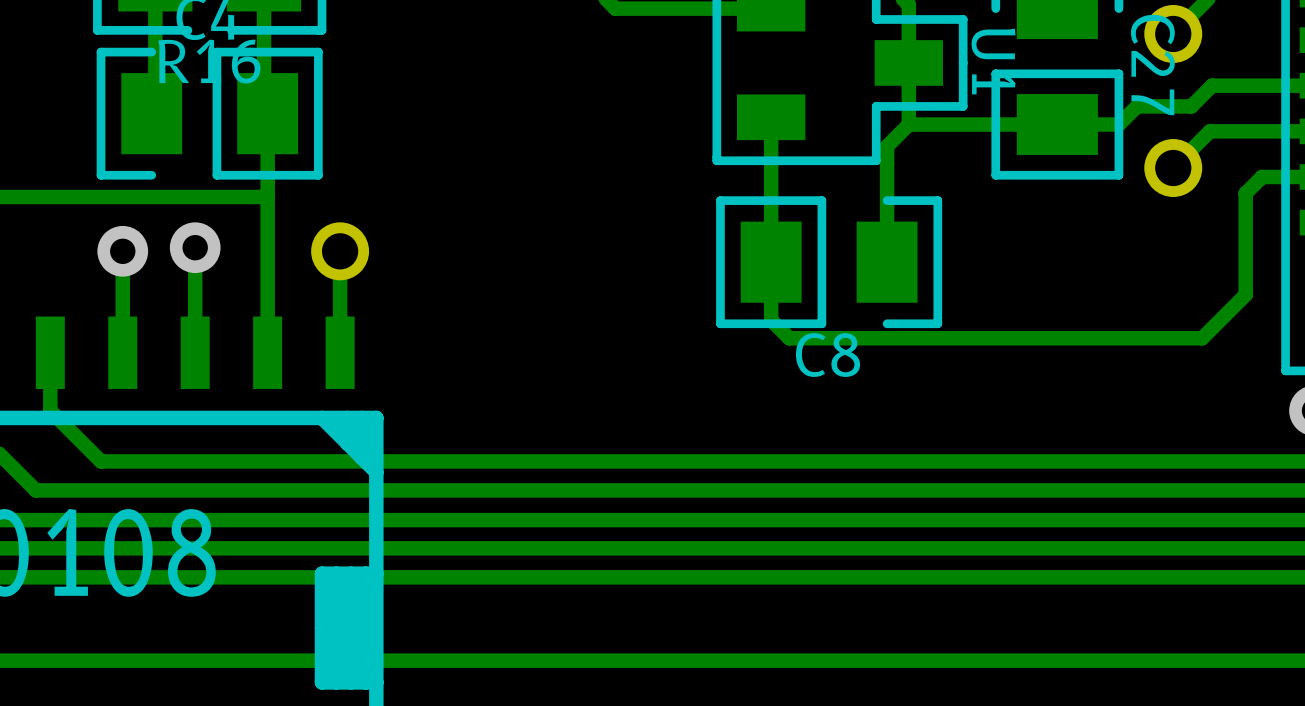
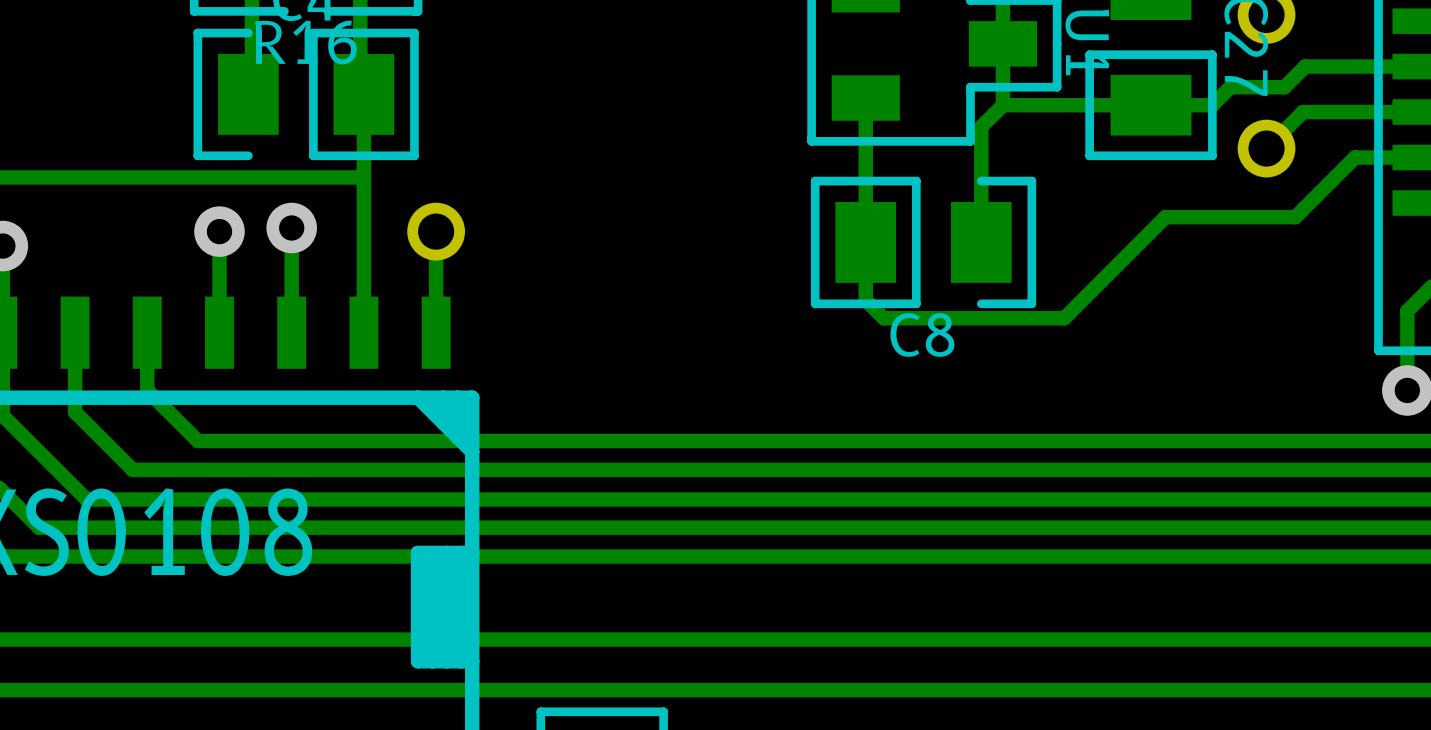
track: (1245, 193) (1245, 294) (1202, 338) (970, 338) -> (1338, 173) (1295, 217) (1165, 217) (1064, 318)

